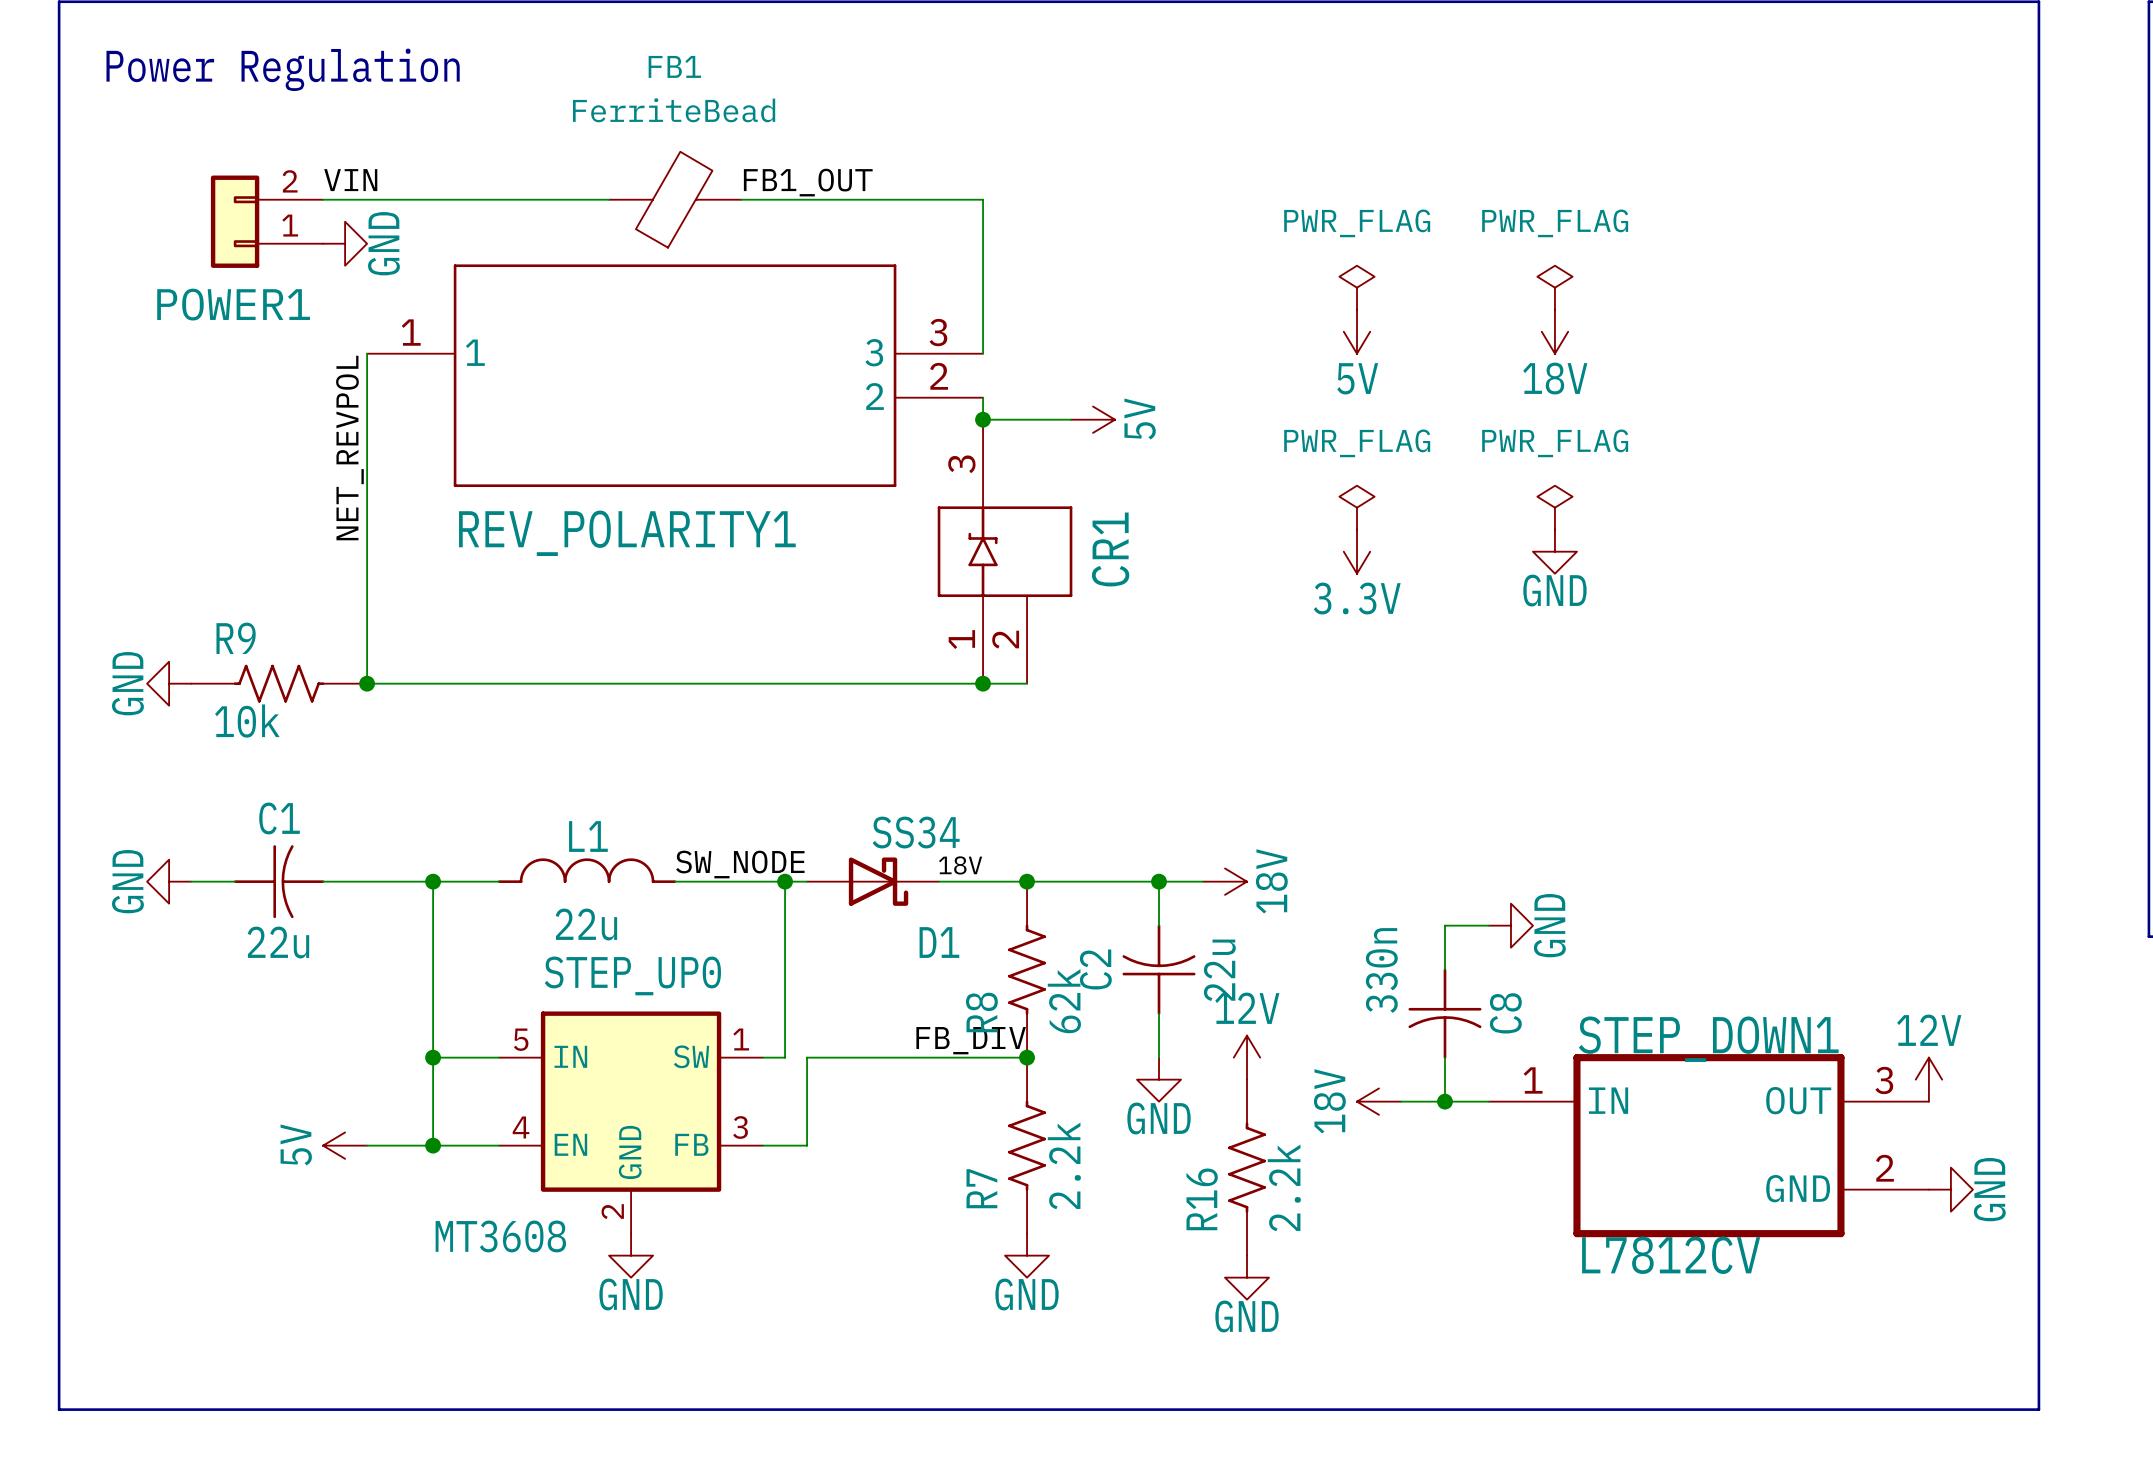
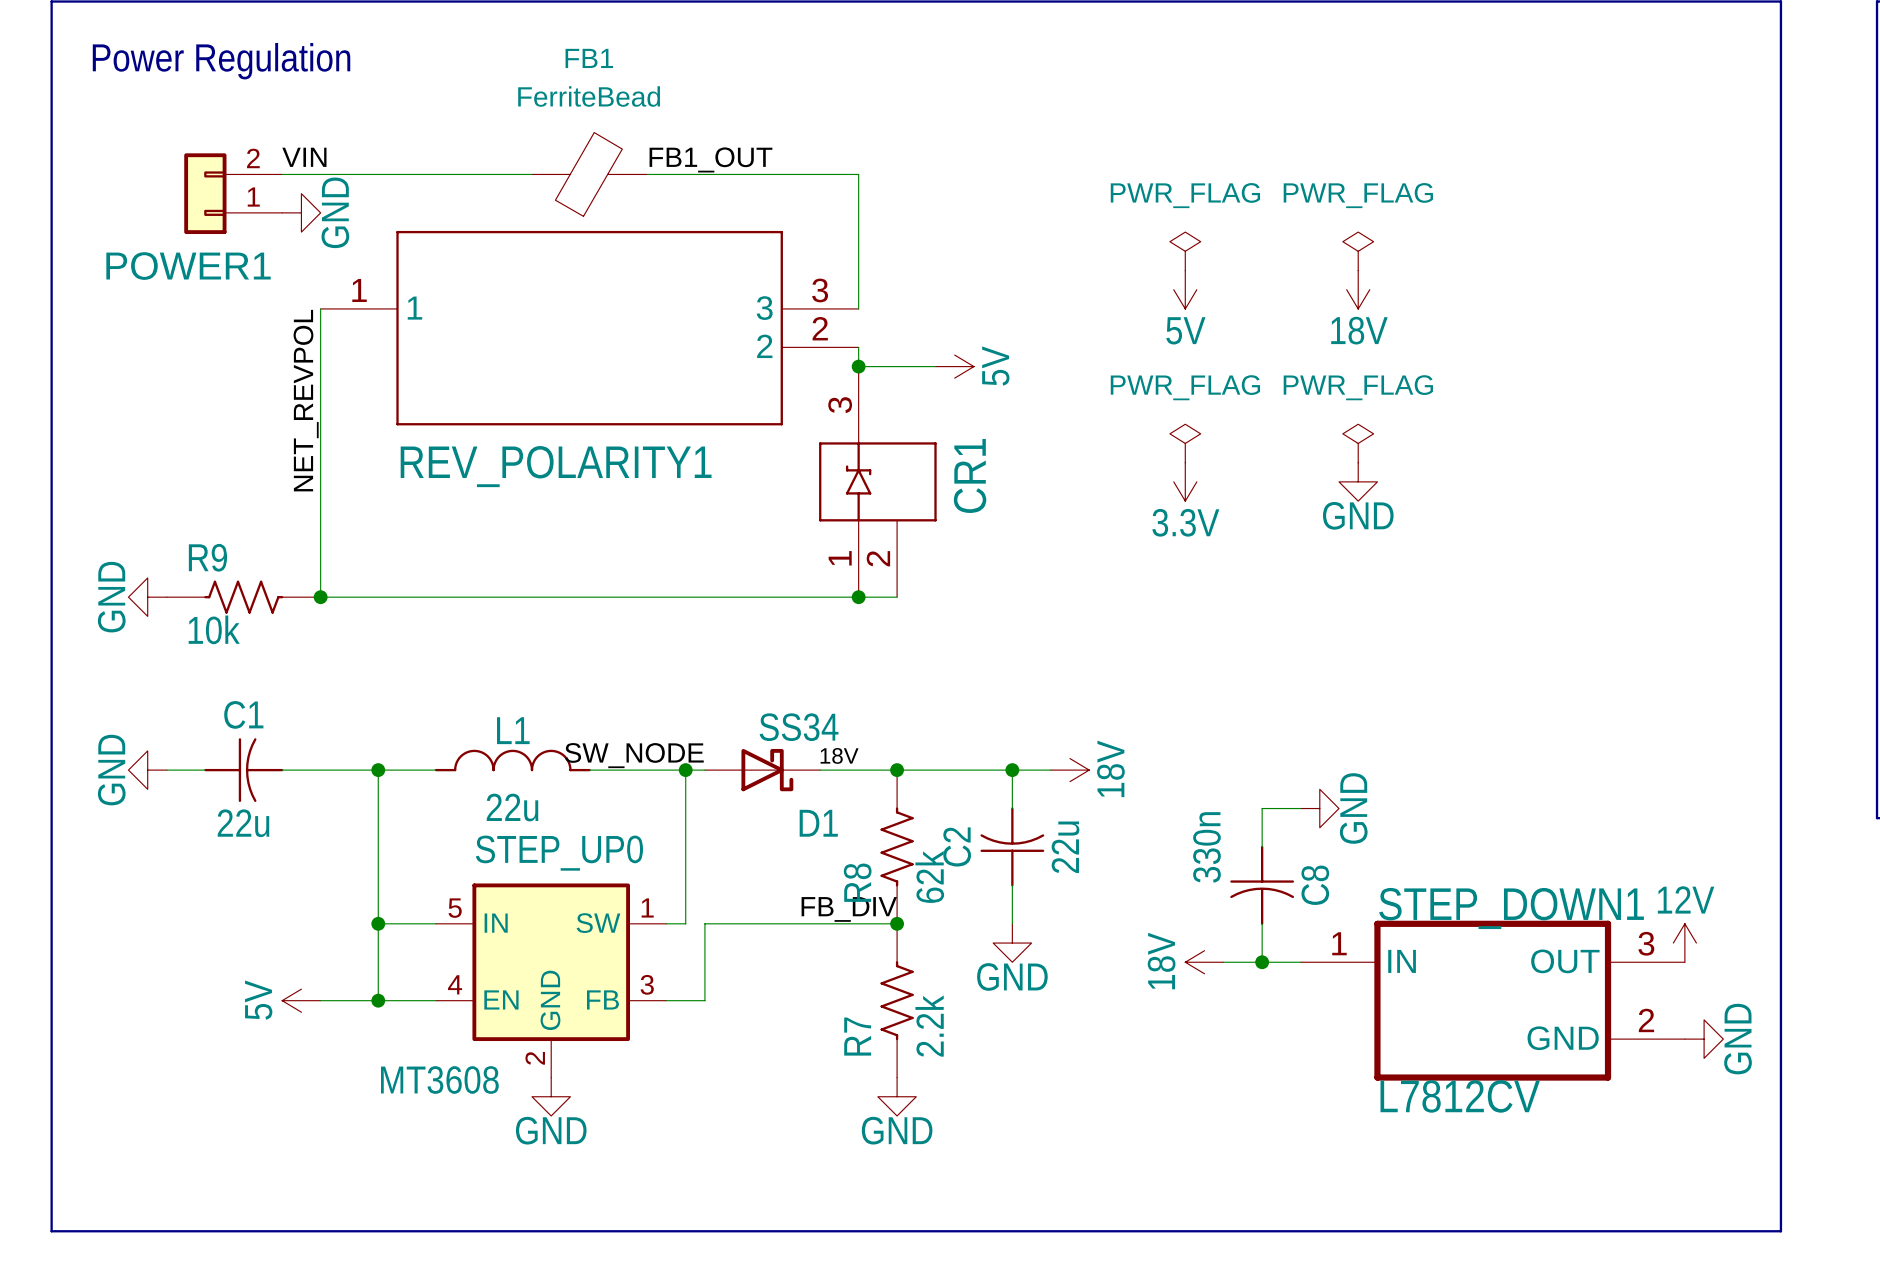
power symbol: 12V (1247, 1057) -> none
R16: 2.2k (1247, 1167) -> none
power symbol: GND (1247, 1277) -> none

